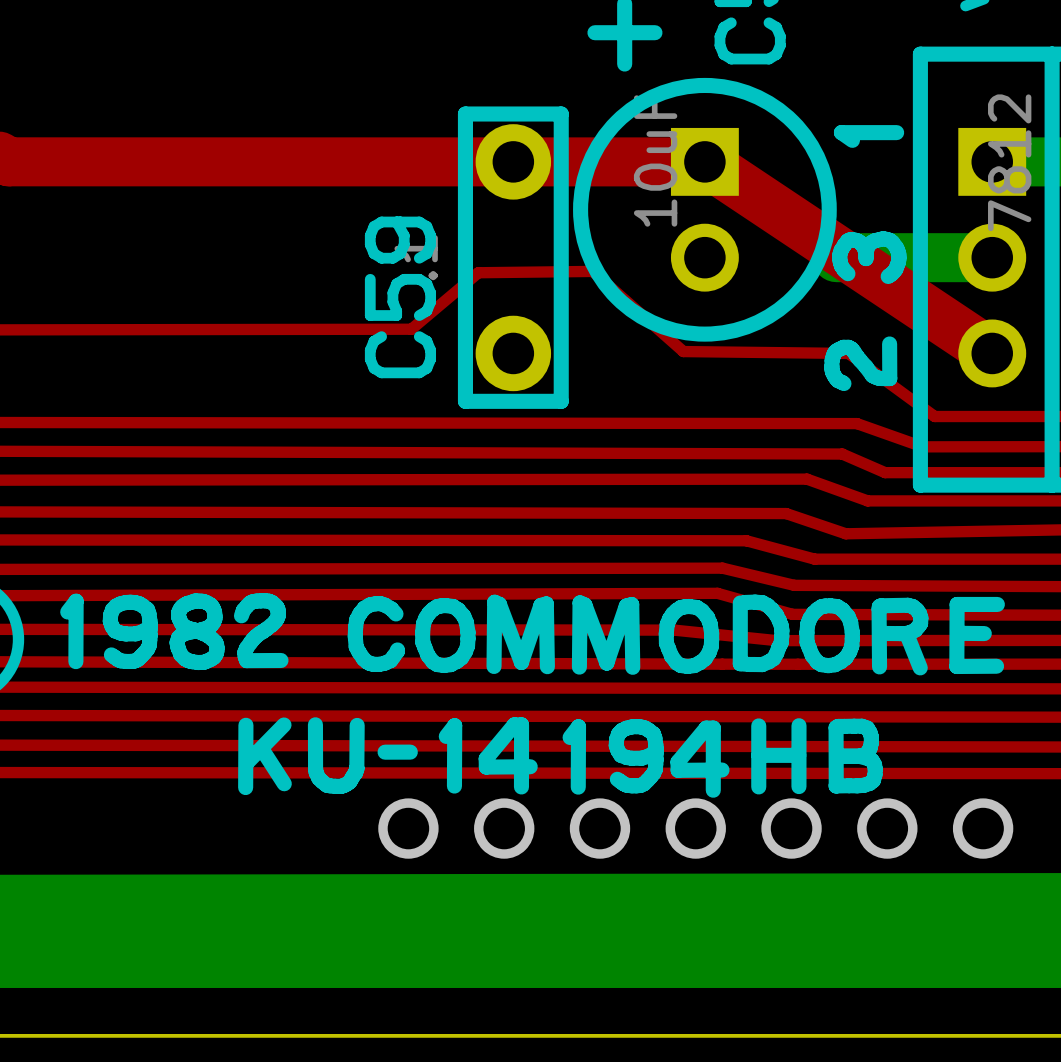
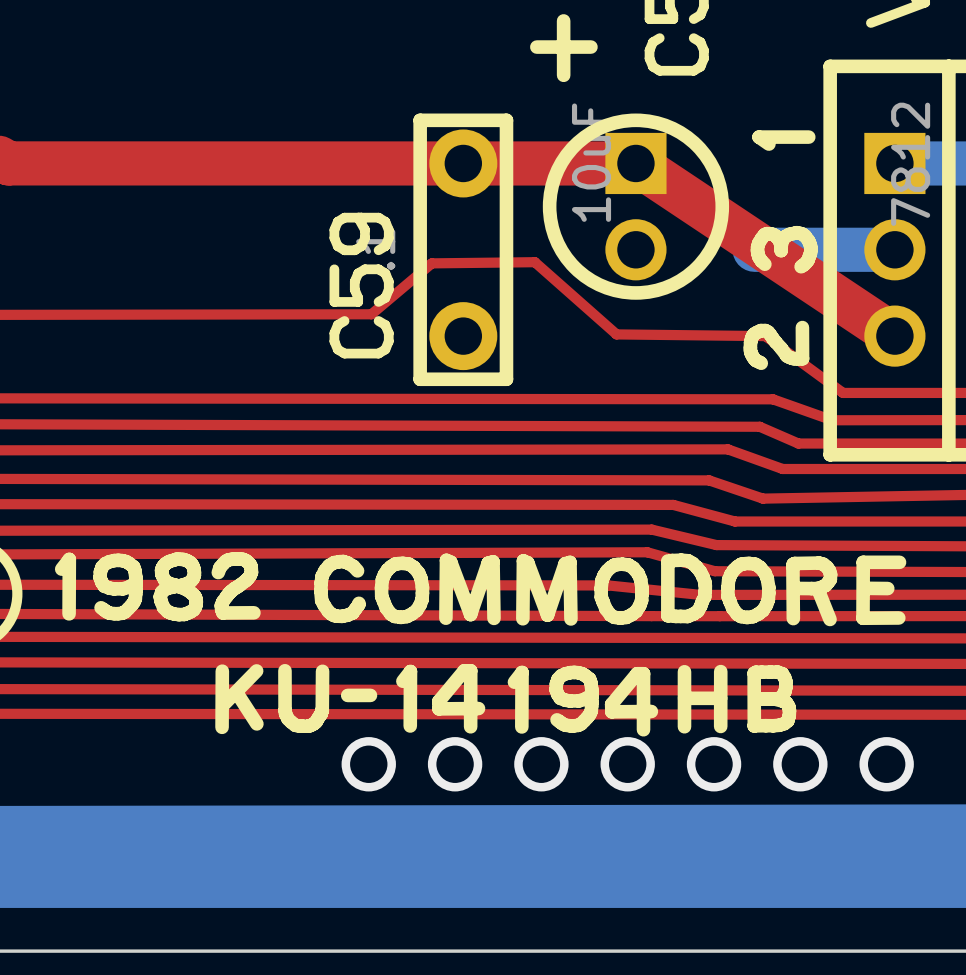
drawing: [573, 77, 837, 342] -> none
part footprint: [670, 127, 739, 292] -> [542, 113, 730, 300]

